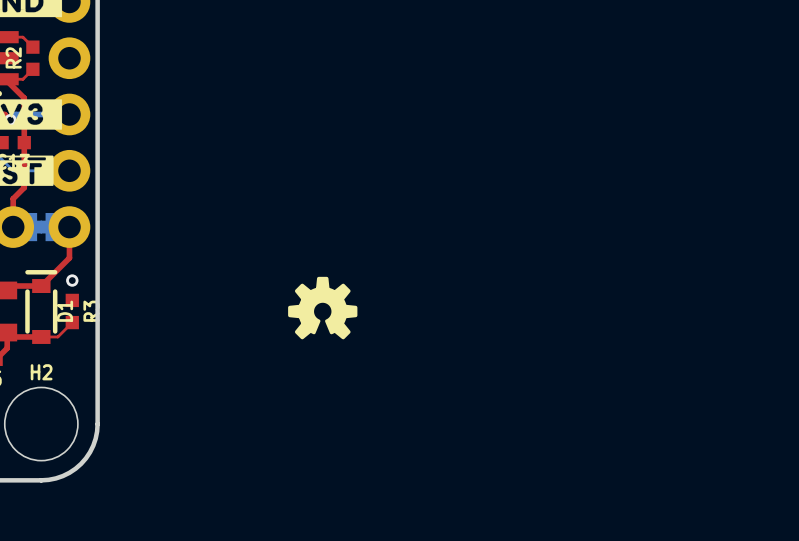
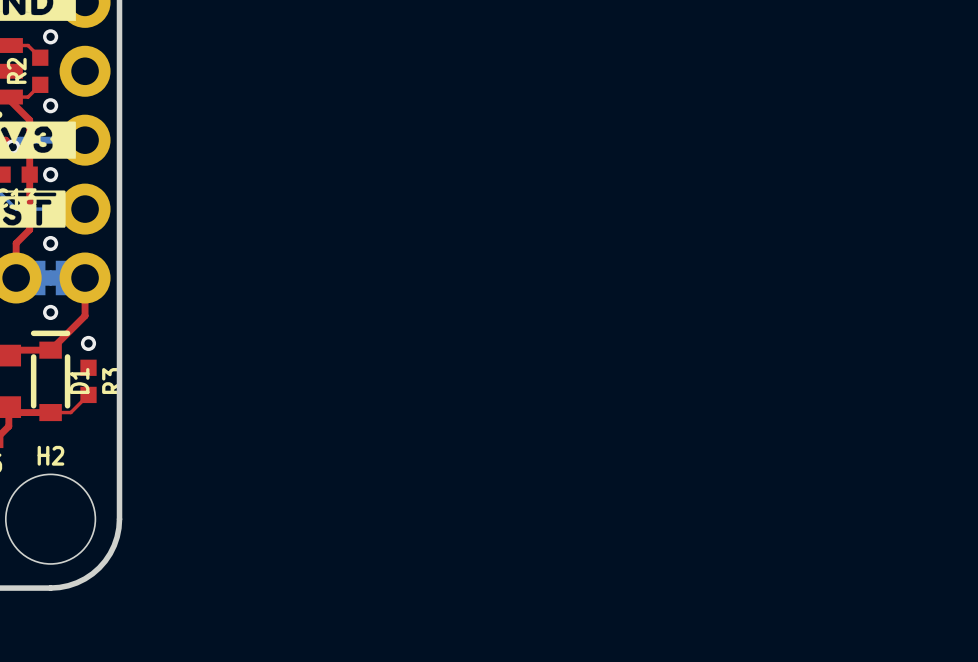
via: none -> (50, 36)
via: none -> (50, 105)
via: none -> (50, 174)
via: none -> (50, 243)
via: none -> (50, 312)
drawing: [288, 276, 358, 340] -> none

